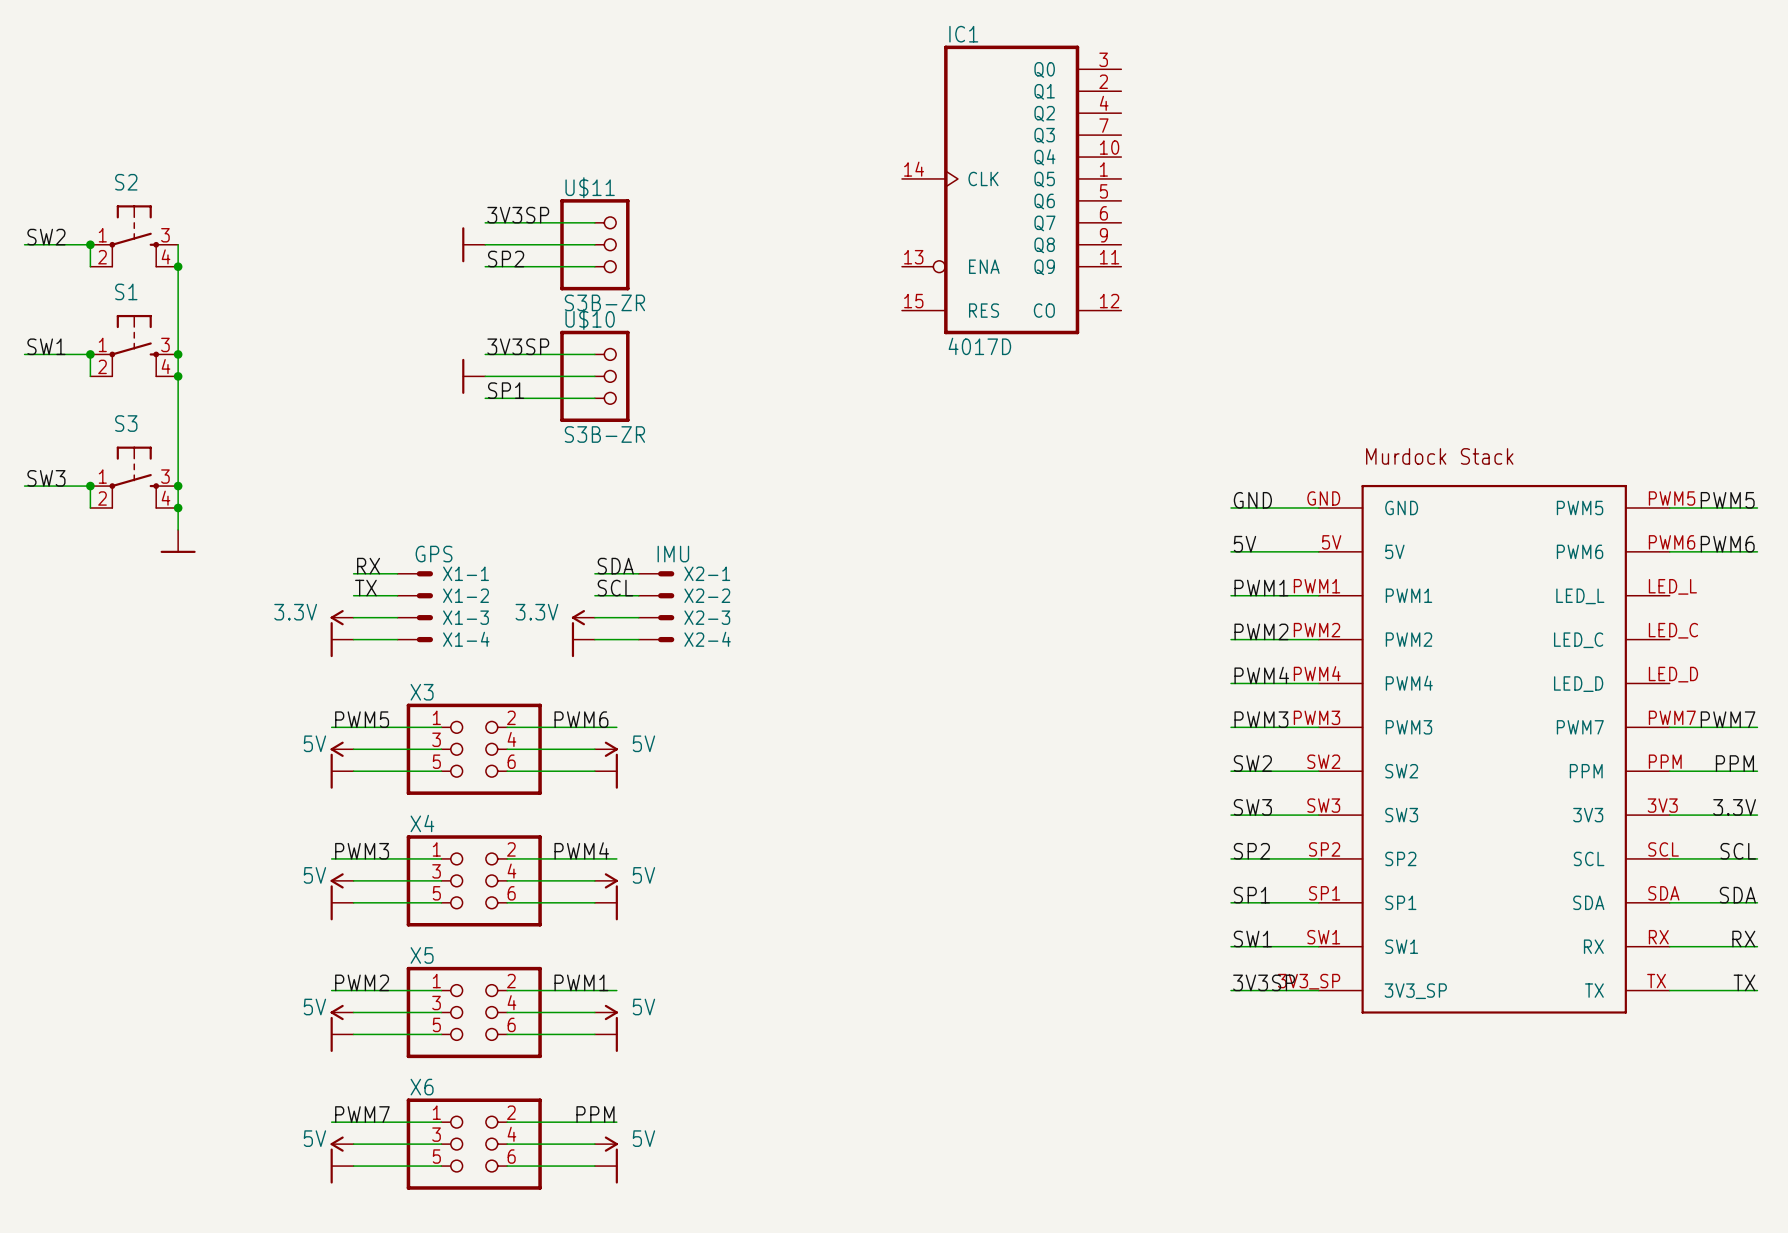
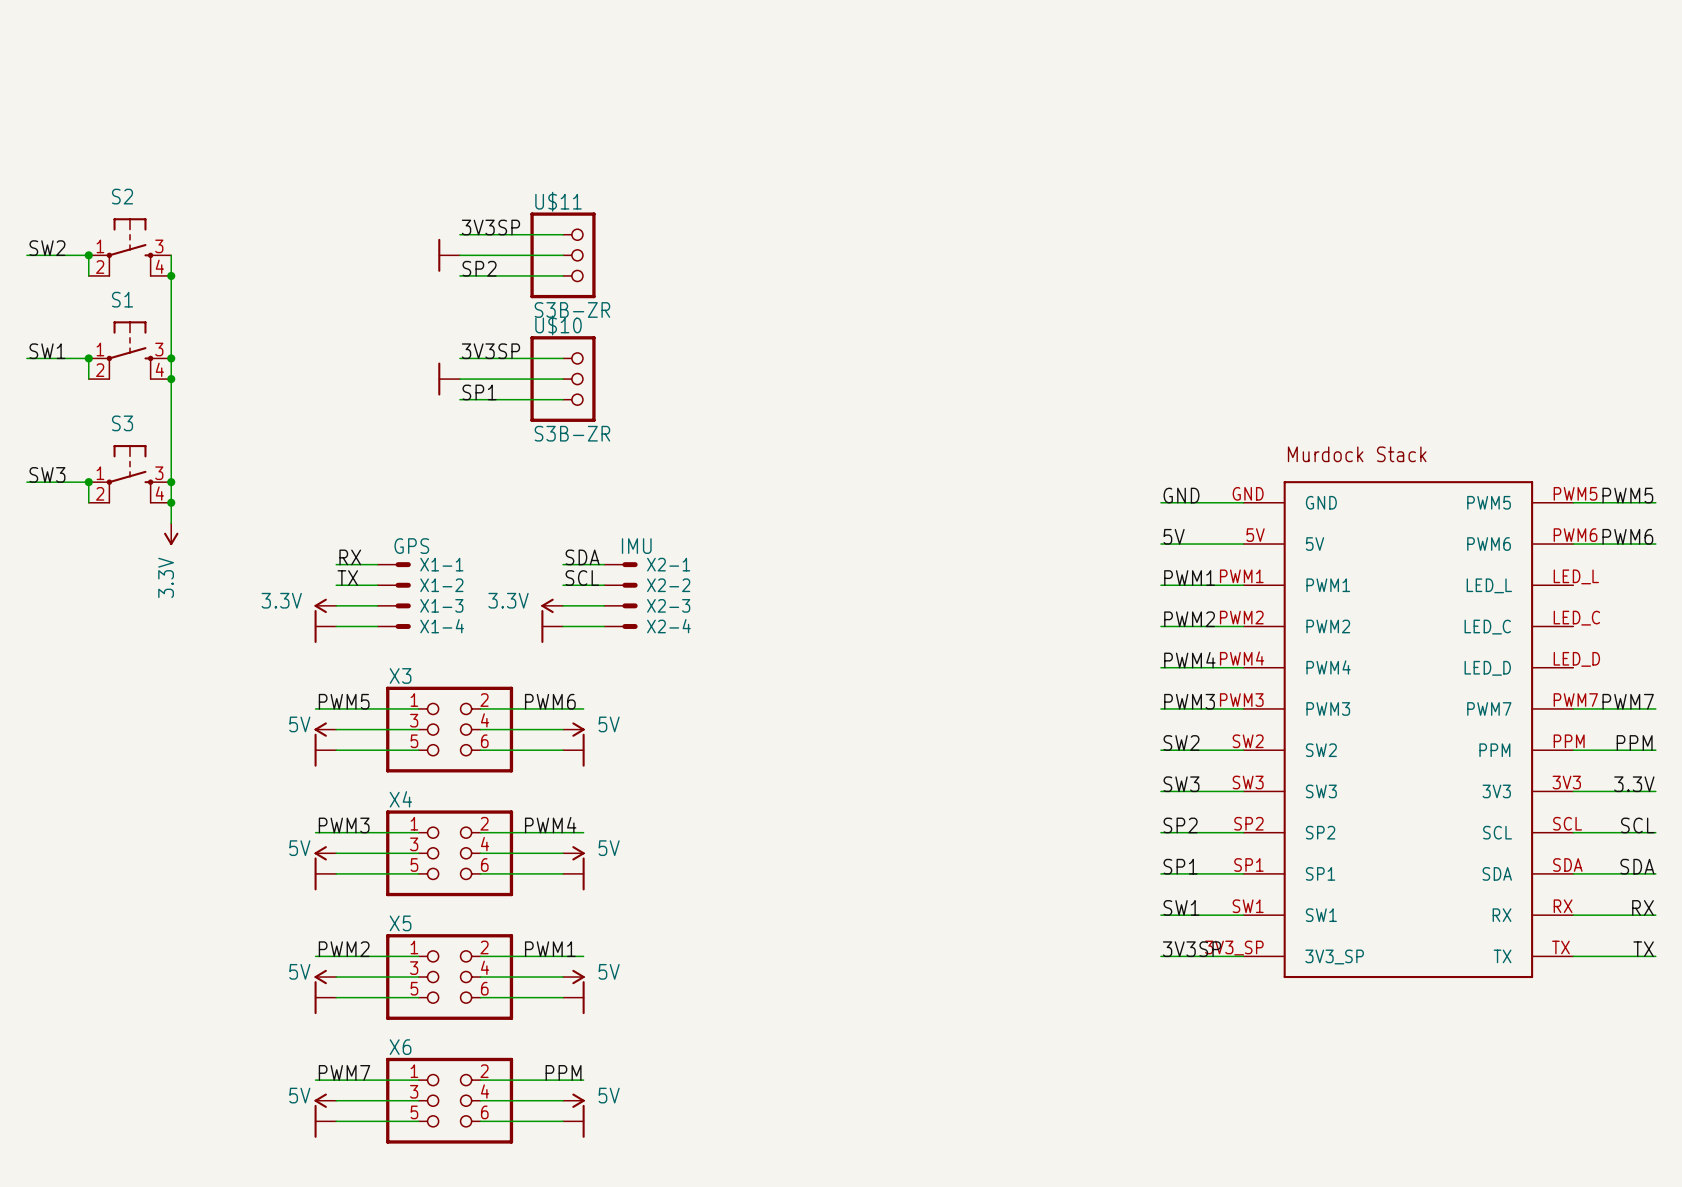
IC1: 4017D (1011, 189) -> none
power symbol shape: [160, 529, 196, 553] -> [164, 523, 179, 546]
power symbol text: none -> 3.3V (166, 577)

